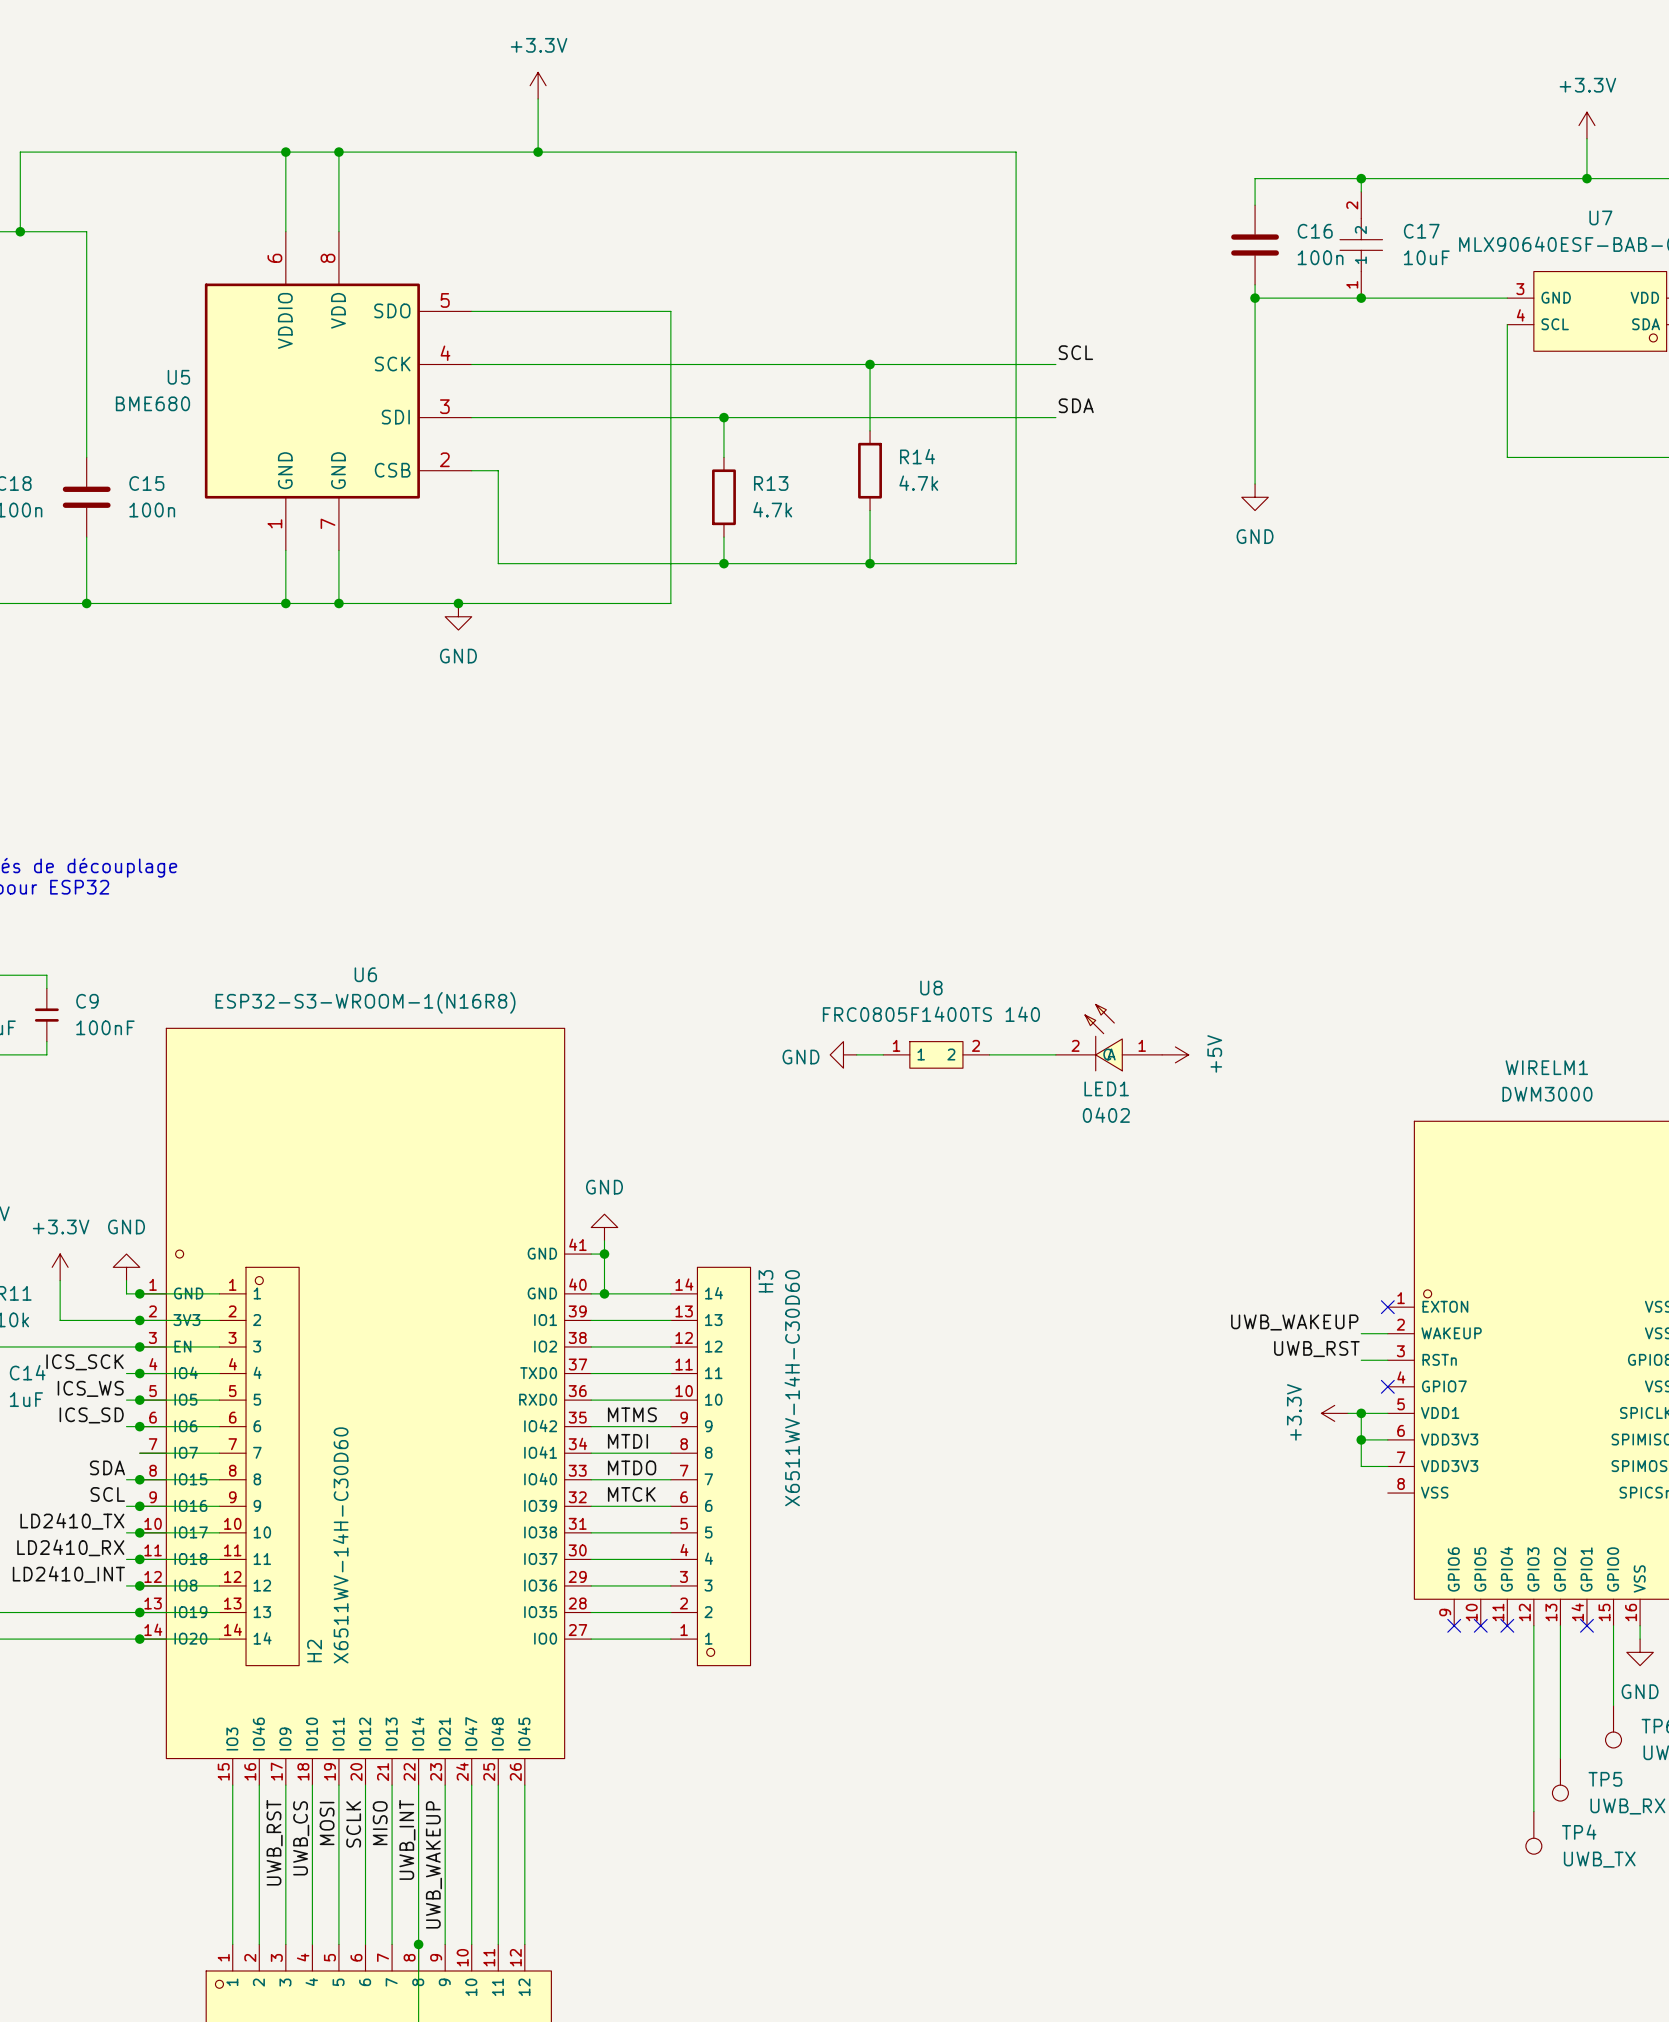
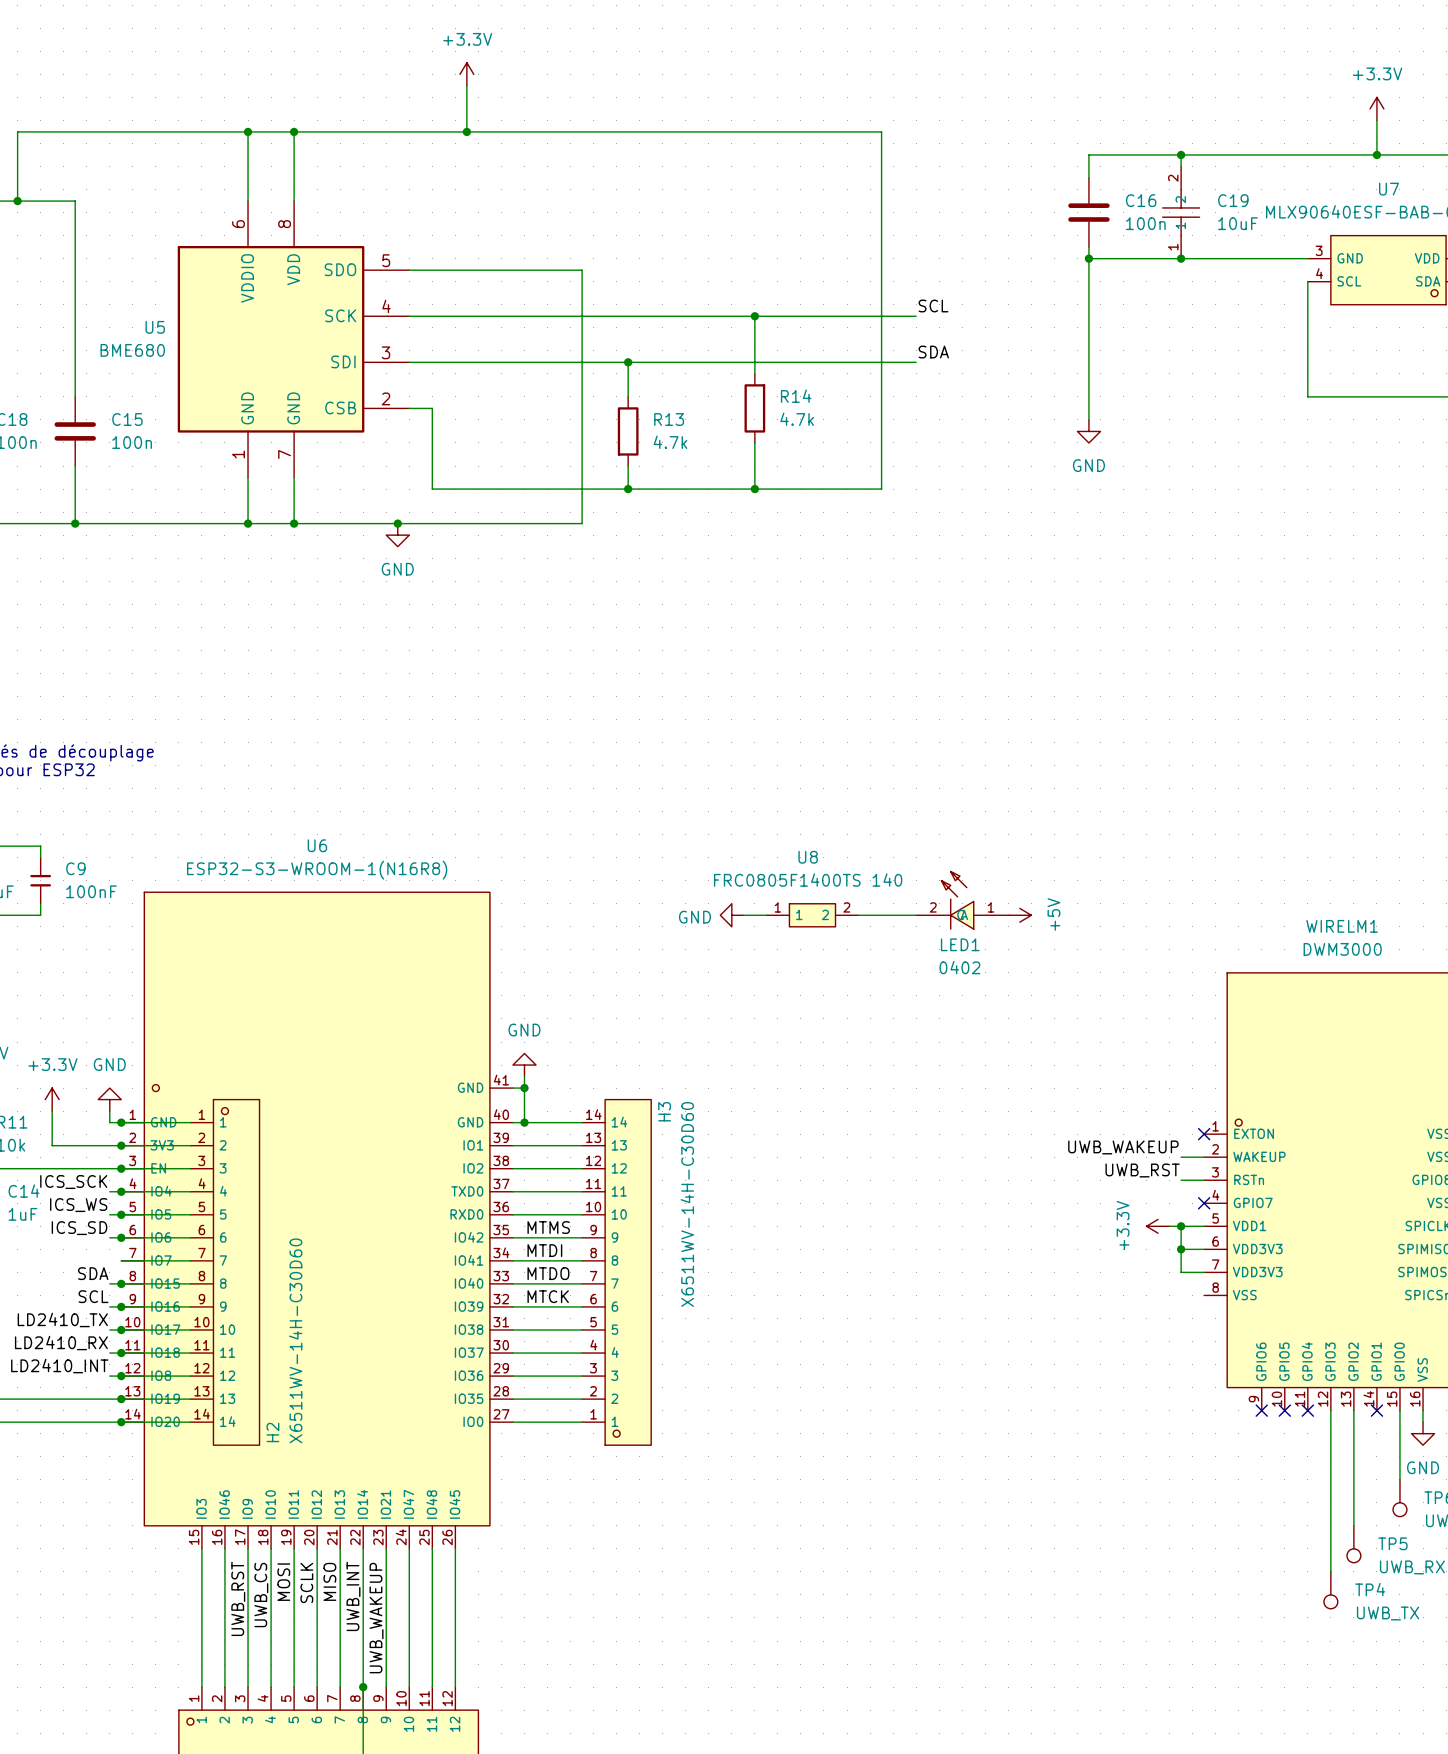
C17 name: C17 (1421, 231) -> C19 (1233, 200)

